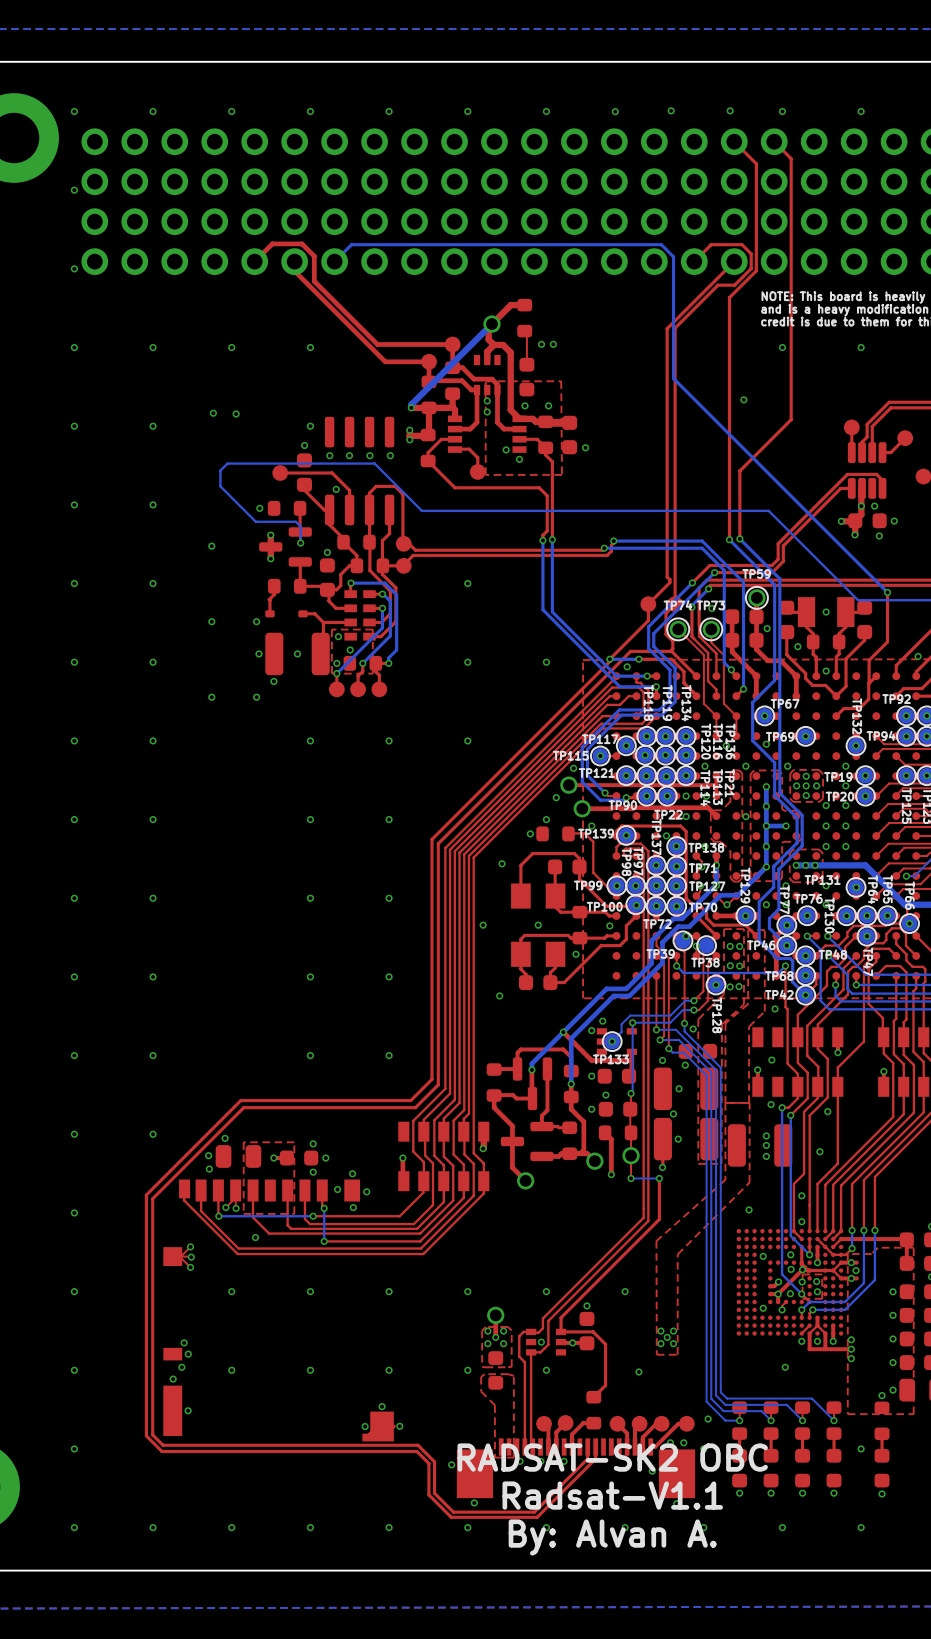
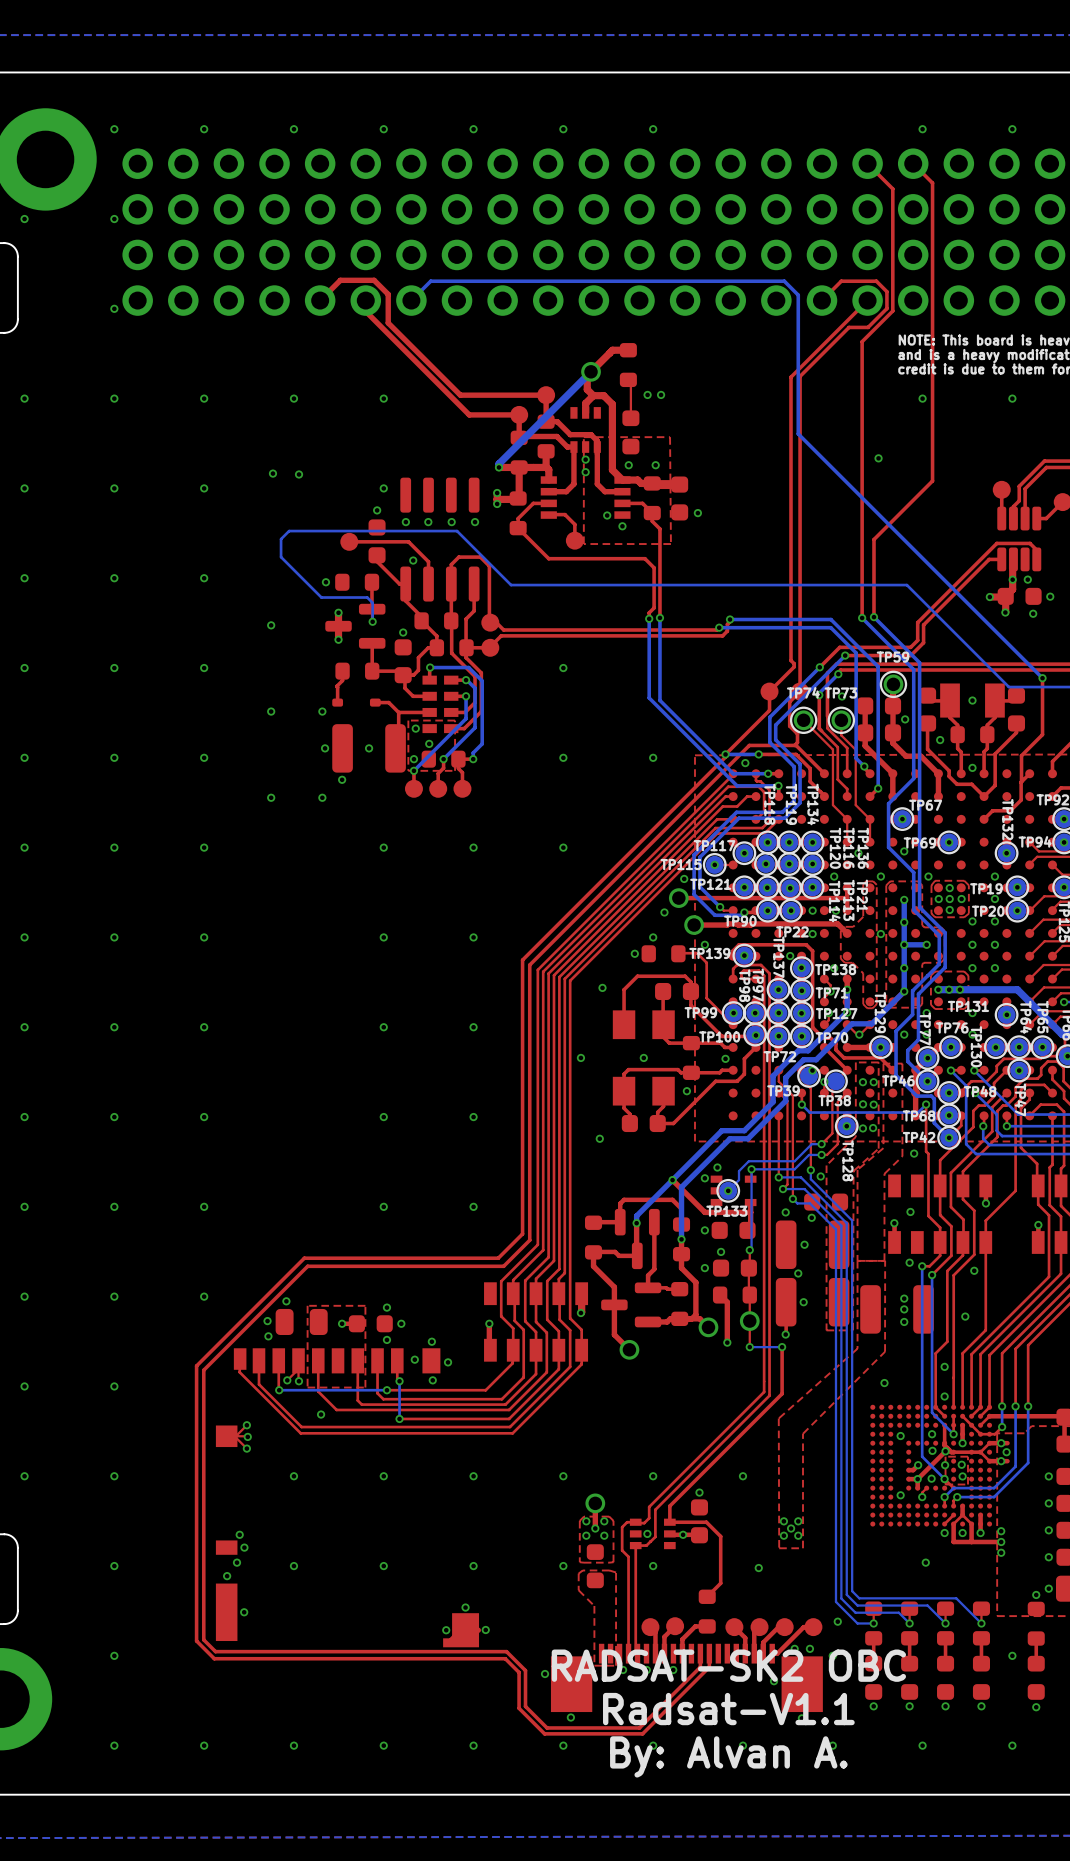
via: (671, 110) -> none
via: (730, 110) -> none
via: (615, 111) -> none

